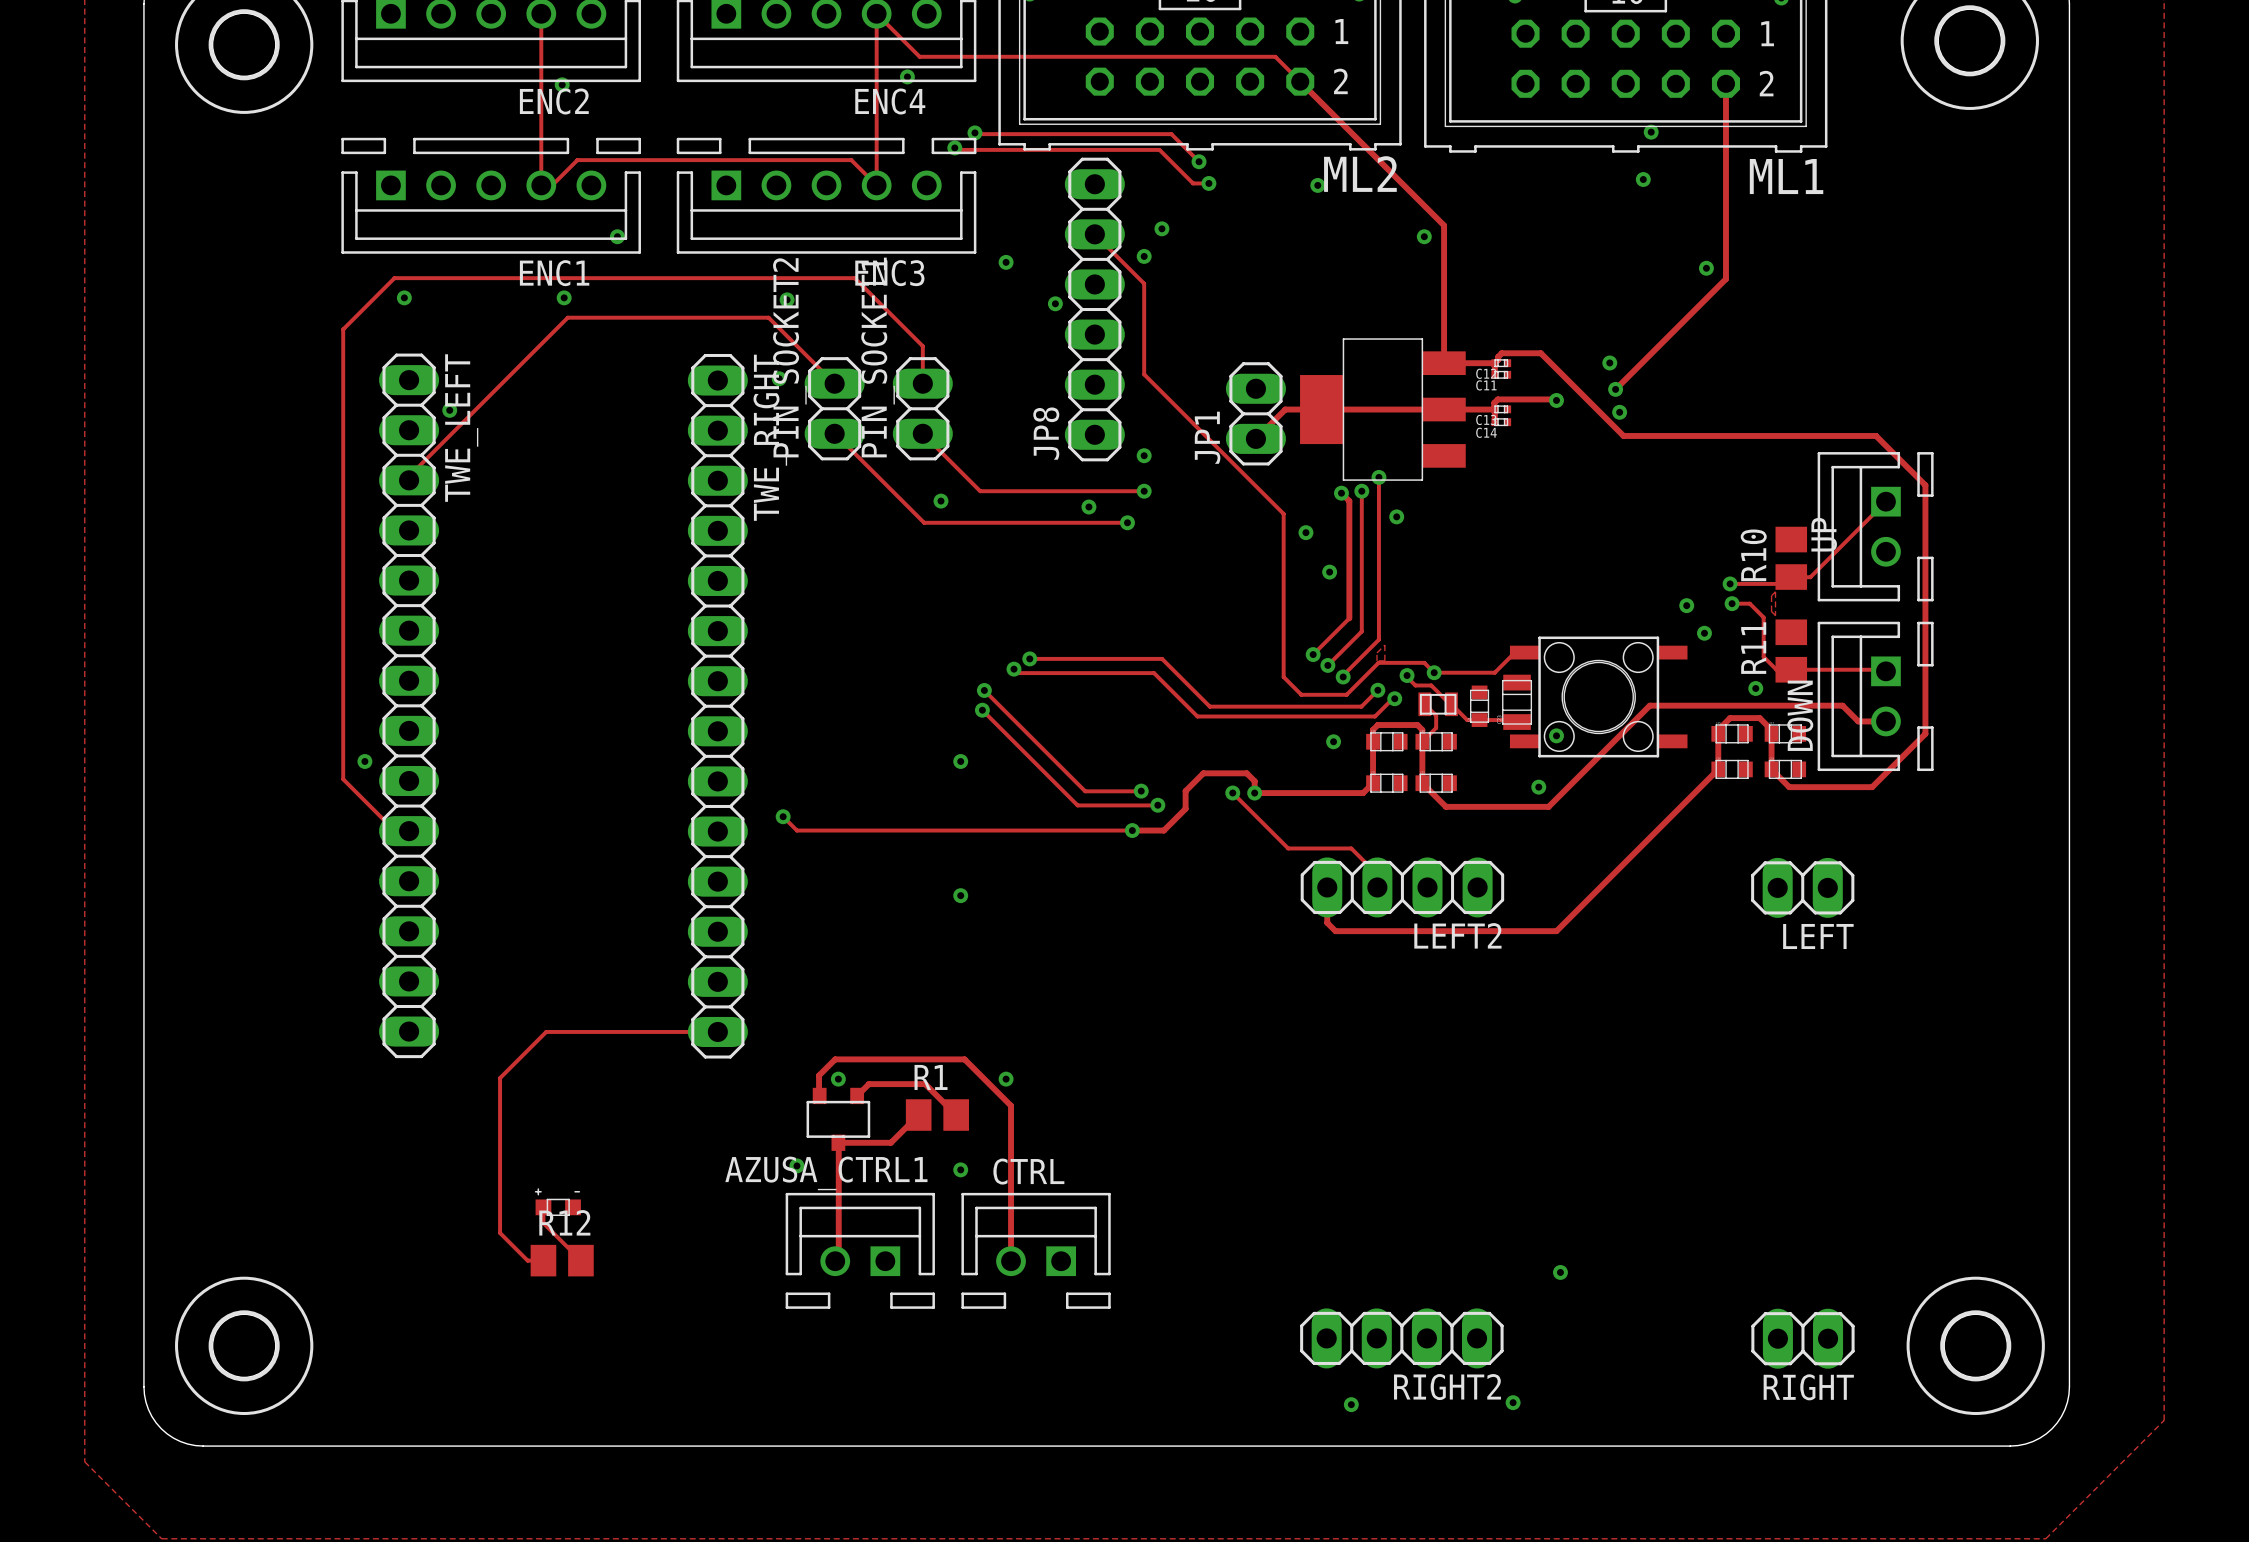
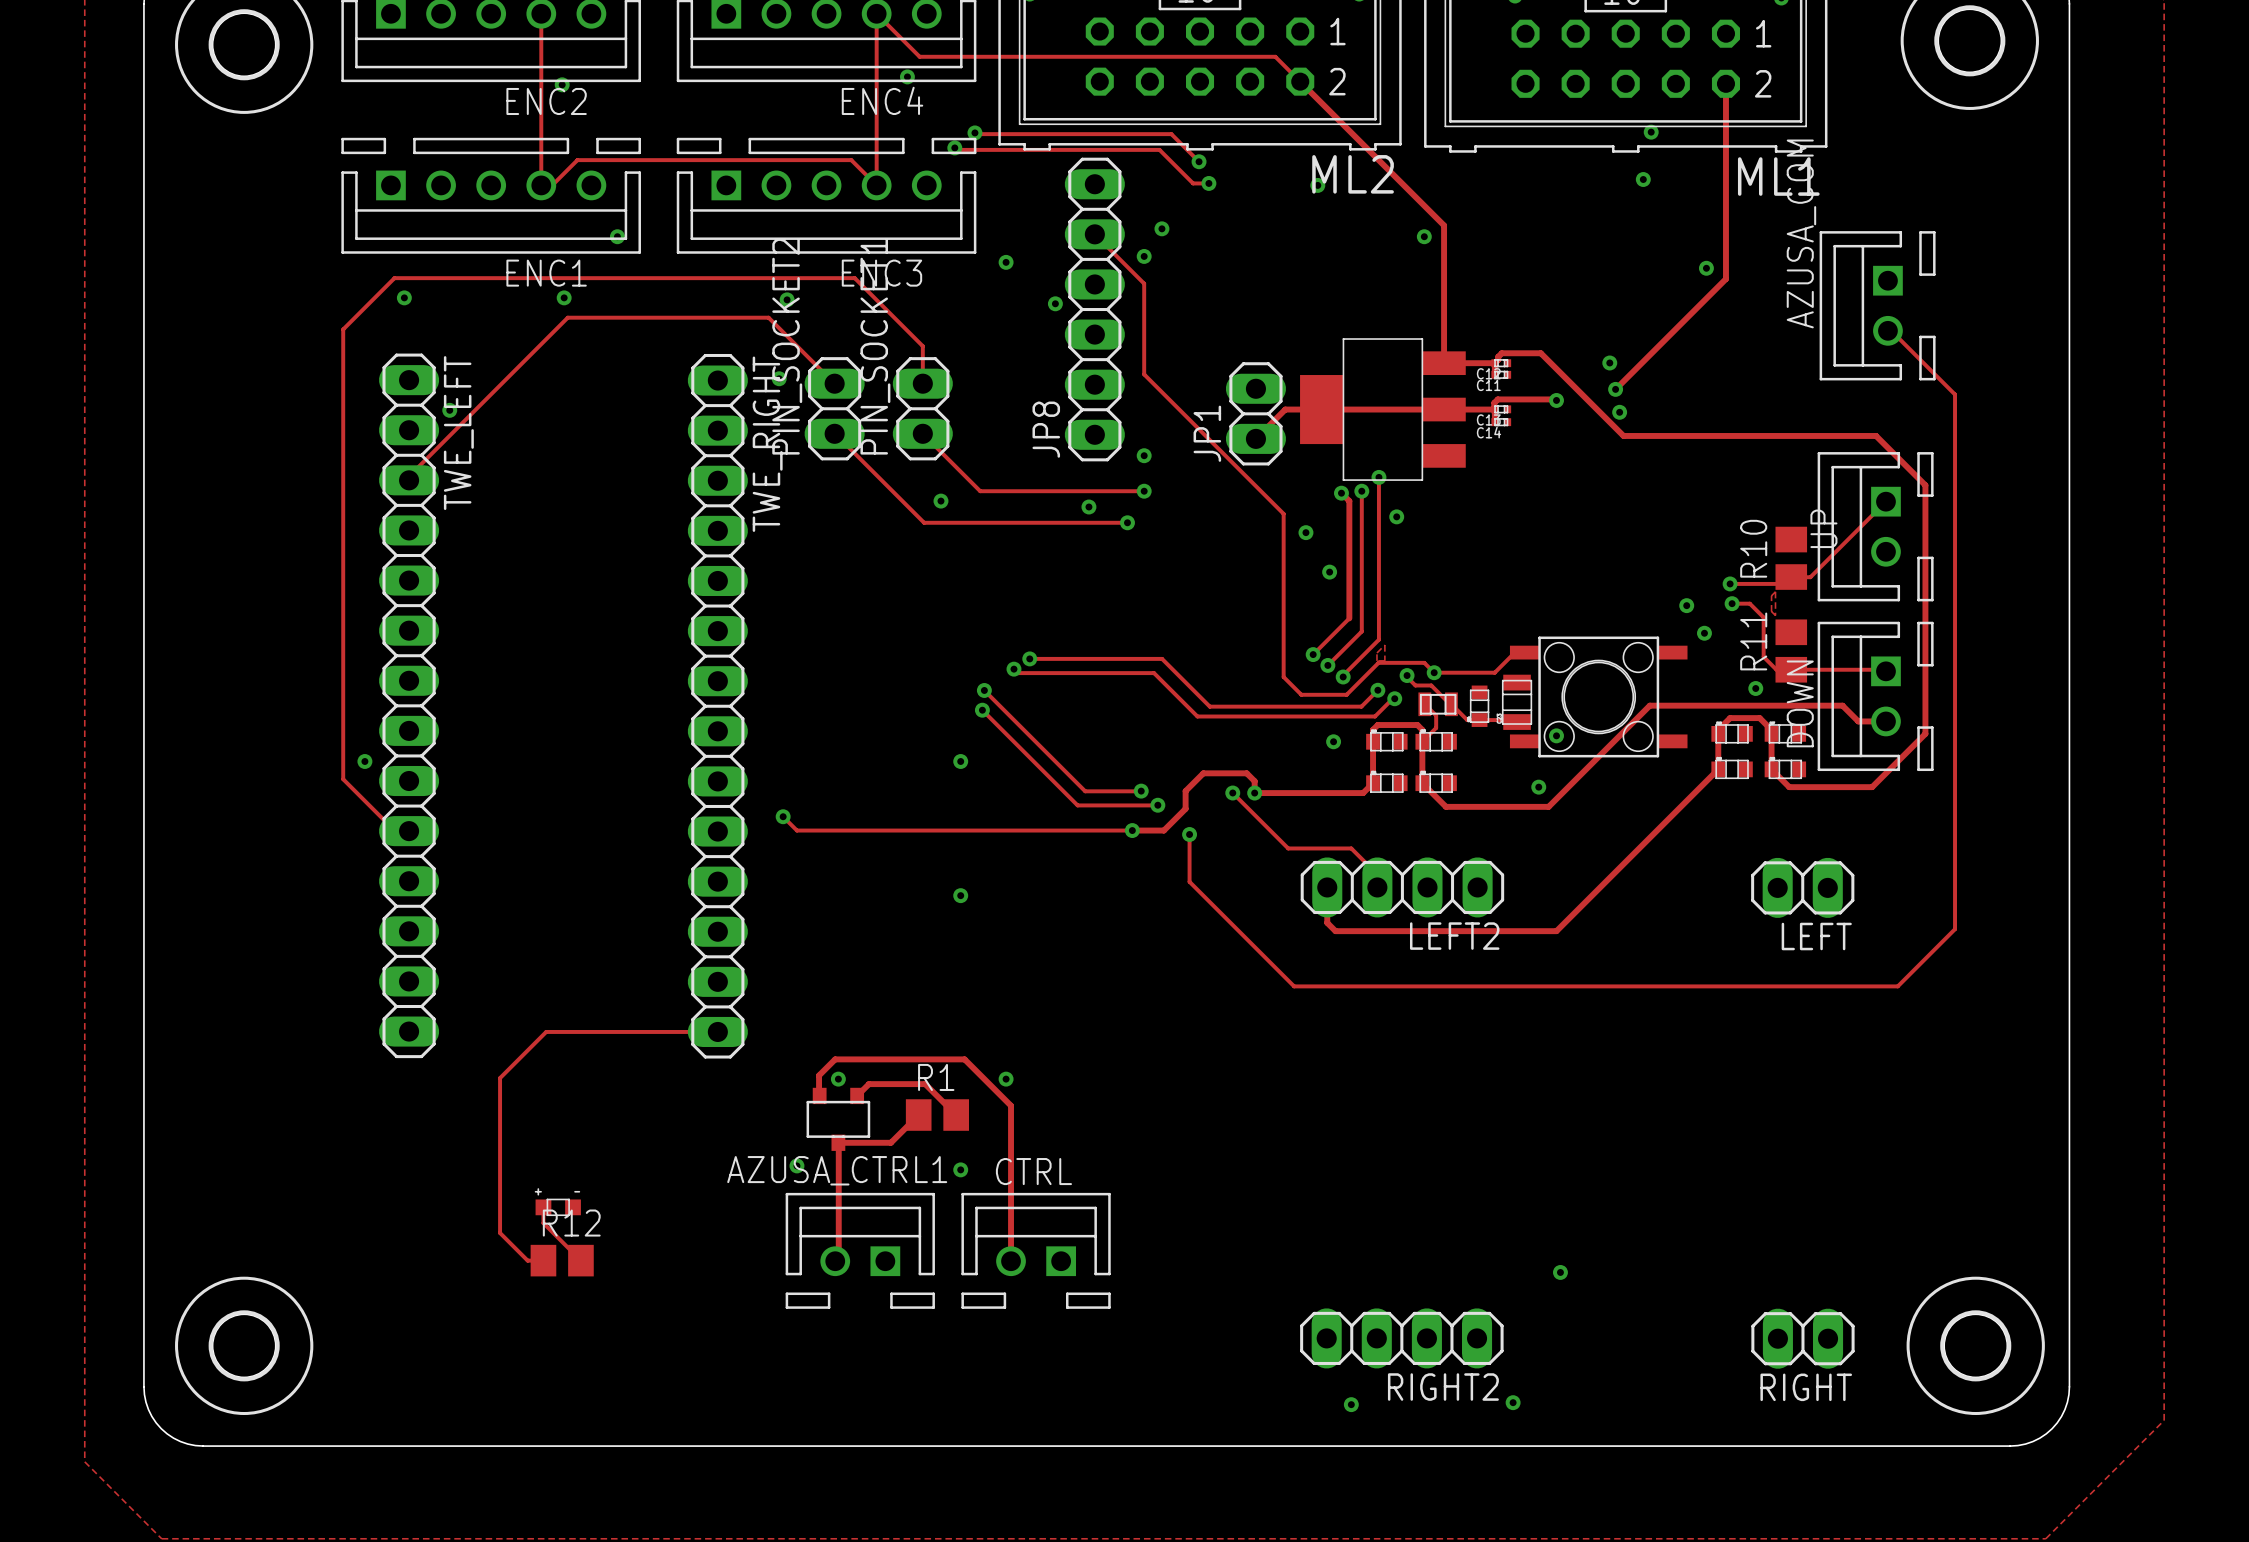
AZUSA_COM: none -> (1877, 305)
track: none -> (1887, 330) (1891, 330) (1955, 394) (1955, 929) (1897, 986) (1294, 986) (1189, 881) (1189, 834)
via: none -> (1189, 834)

